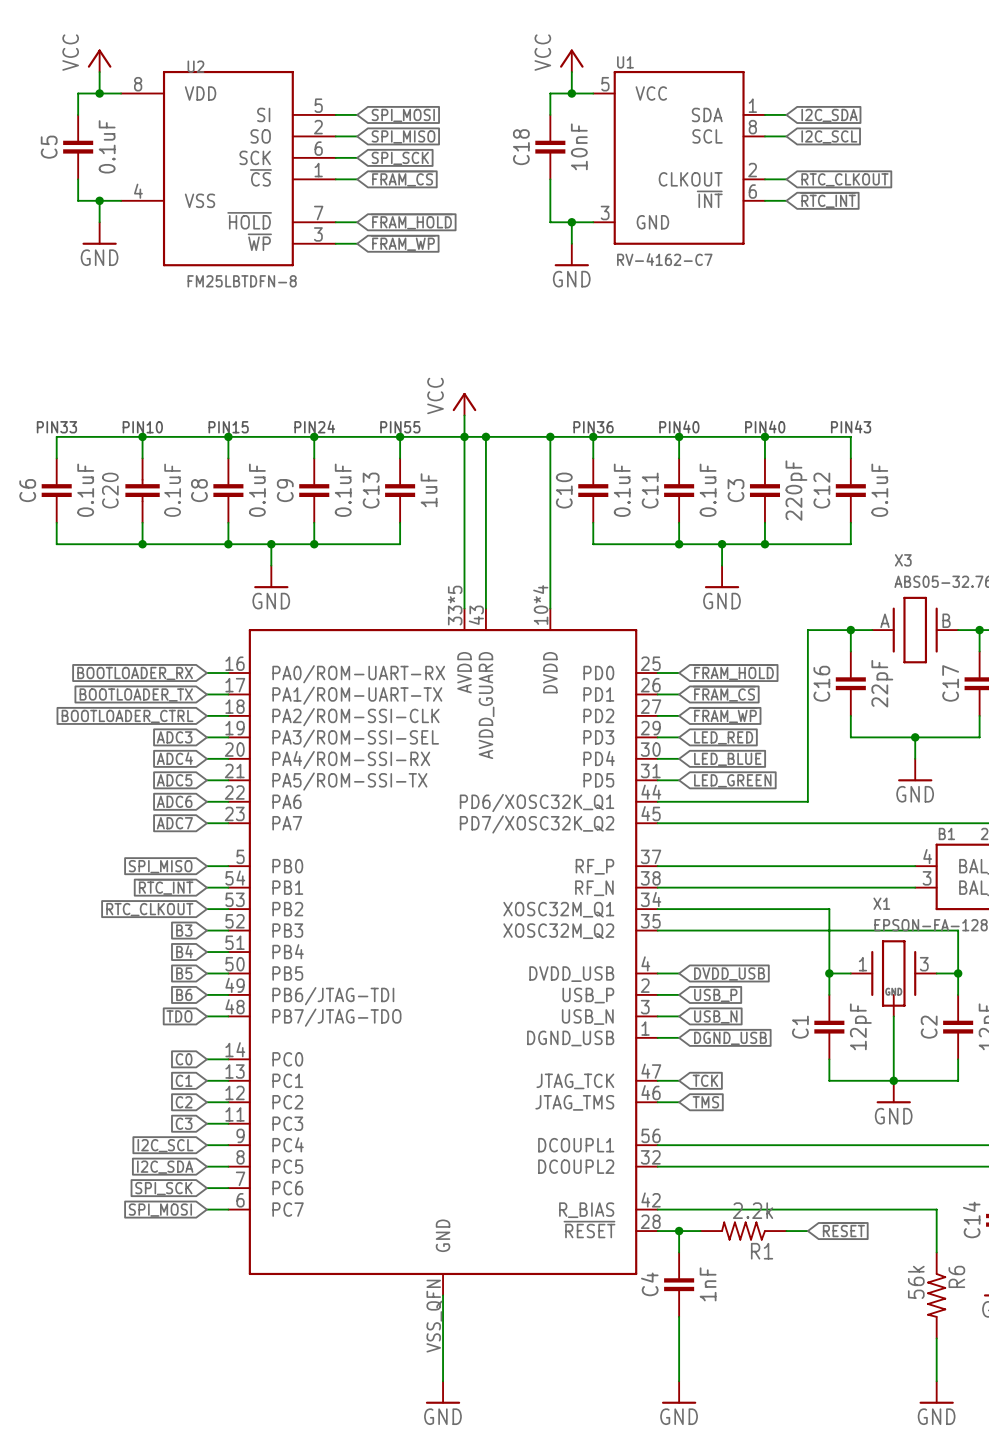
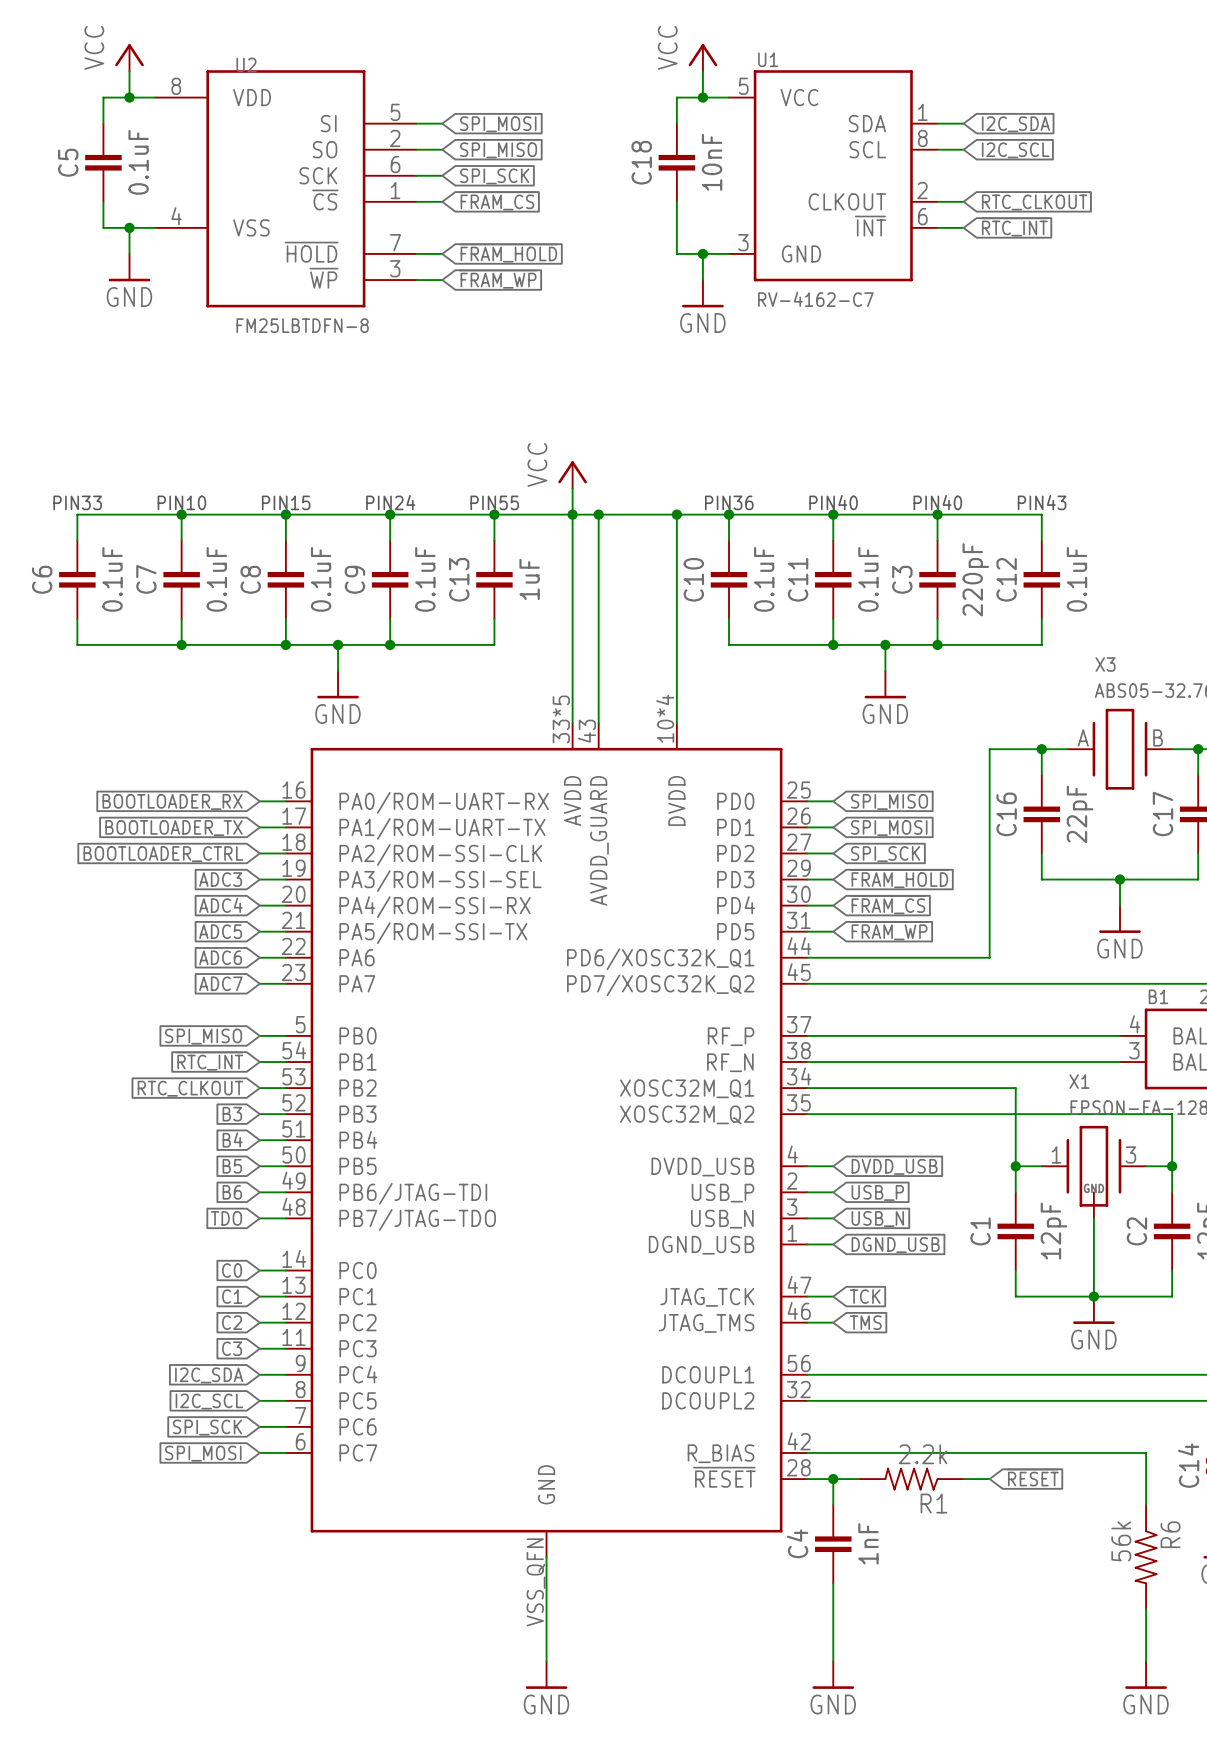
C20: 0.1uF (142, 490) -> none
C7: none -> 0.1uF (181, 579)
global label: ~{FRAM_HOLD} (733, 672) -> SPI_MISO (889, 801)
global label: ~{FRAM_CS} (724, 693) -> SPI_MOSI (889, 828)
global label: ~{FRAM_WP} (725, 715) -> SPI_SCK (885, 854)
global label: LED_RED (723, 737) -> ~{FRAM_HOLD} (899, 878)
global label: LED_BLUE (727, 759) -> ~{FRAM_CS} (888, 904)
global label: LED_GREEN (732, 780) -> ~{FRAM_WP} (889, 930)
global label: I2C_SCL (165, 1145) -> I2C_SDA (209, 1375)
global label: I2C_SDA (165, 1167) -> I2C_SCL (209, 1401)

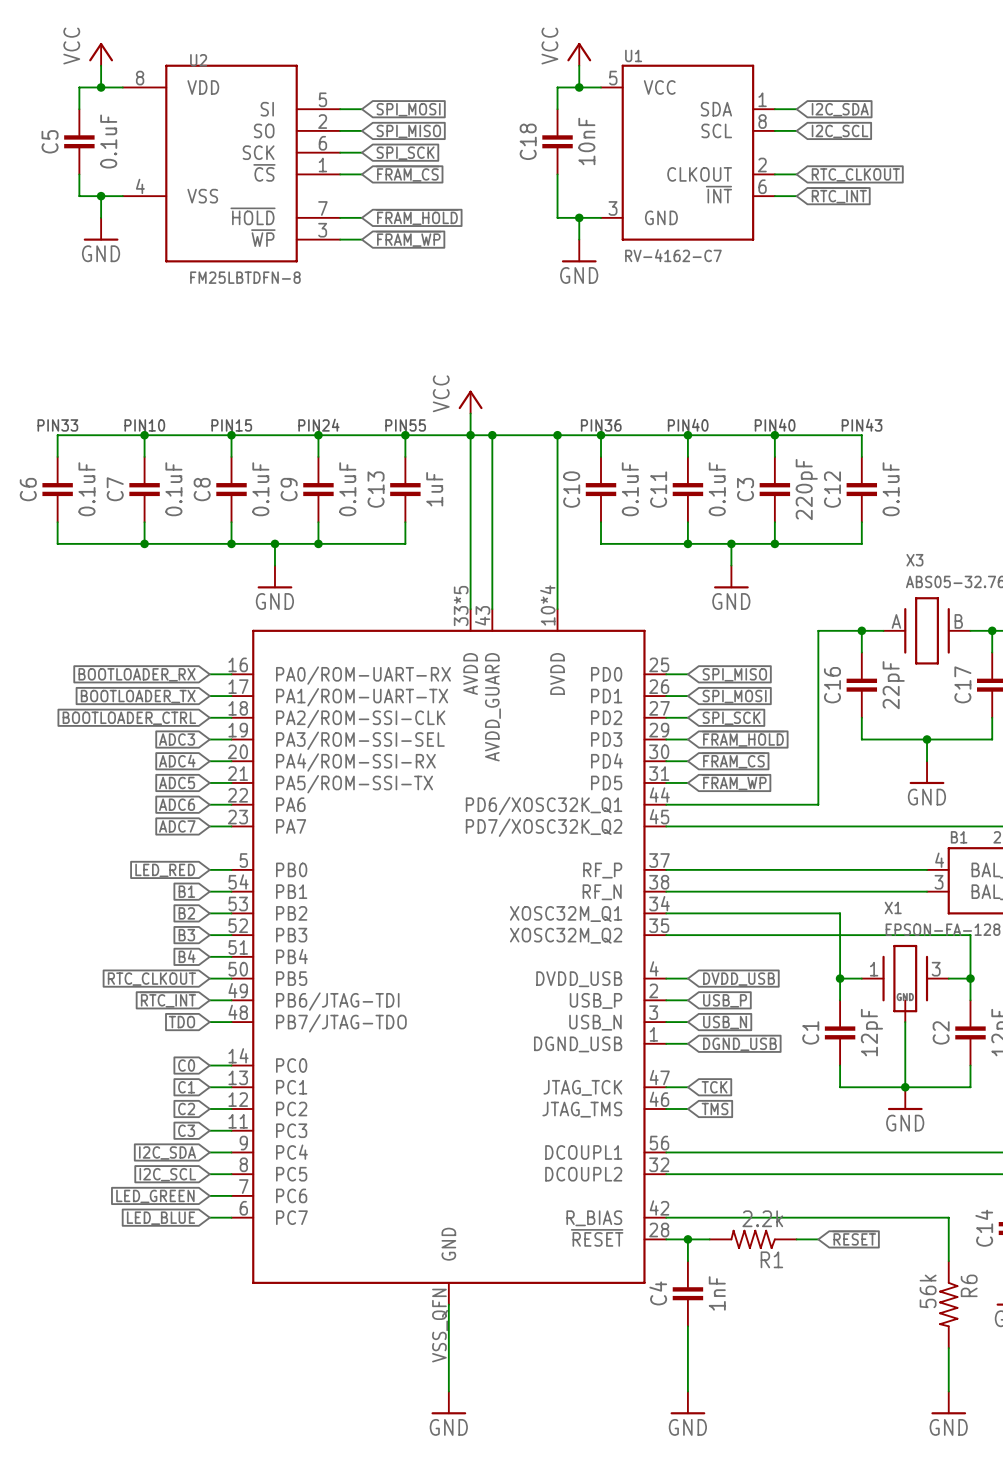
global label: SPI_MISO (203, 1036) -> LED_RED (165, 870)
global label: ~{RTC_INT} (209, 1061) -> B1 (186, 891)
global label: RTC_CLKOUT (190, 1088) -> B2 (186, 913)
global label: B5 (232, 1166) -> RTC_CLKOUT (151, 979)
global label: B6 (232, 1192) -> ~{RTC_INT} (167, 999)
global label: SPI_SCK (207, 1427) -> LED_GREEN (155, 1196)
global label: SPI_MOSI (203, 1453) -> LED_BLUE (161, 1218)

